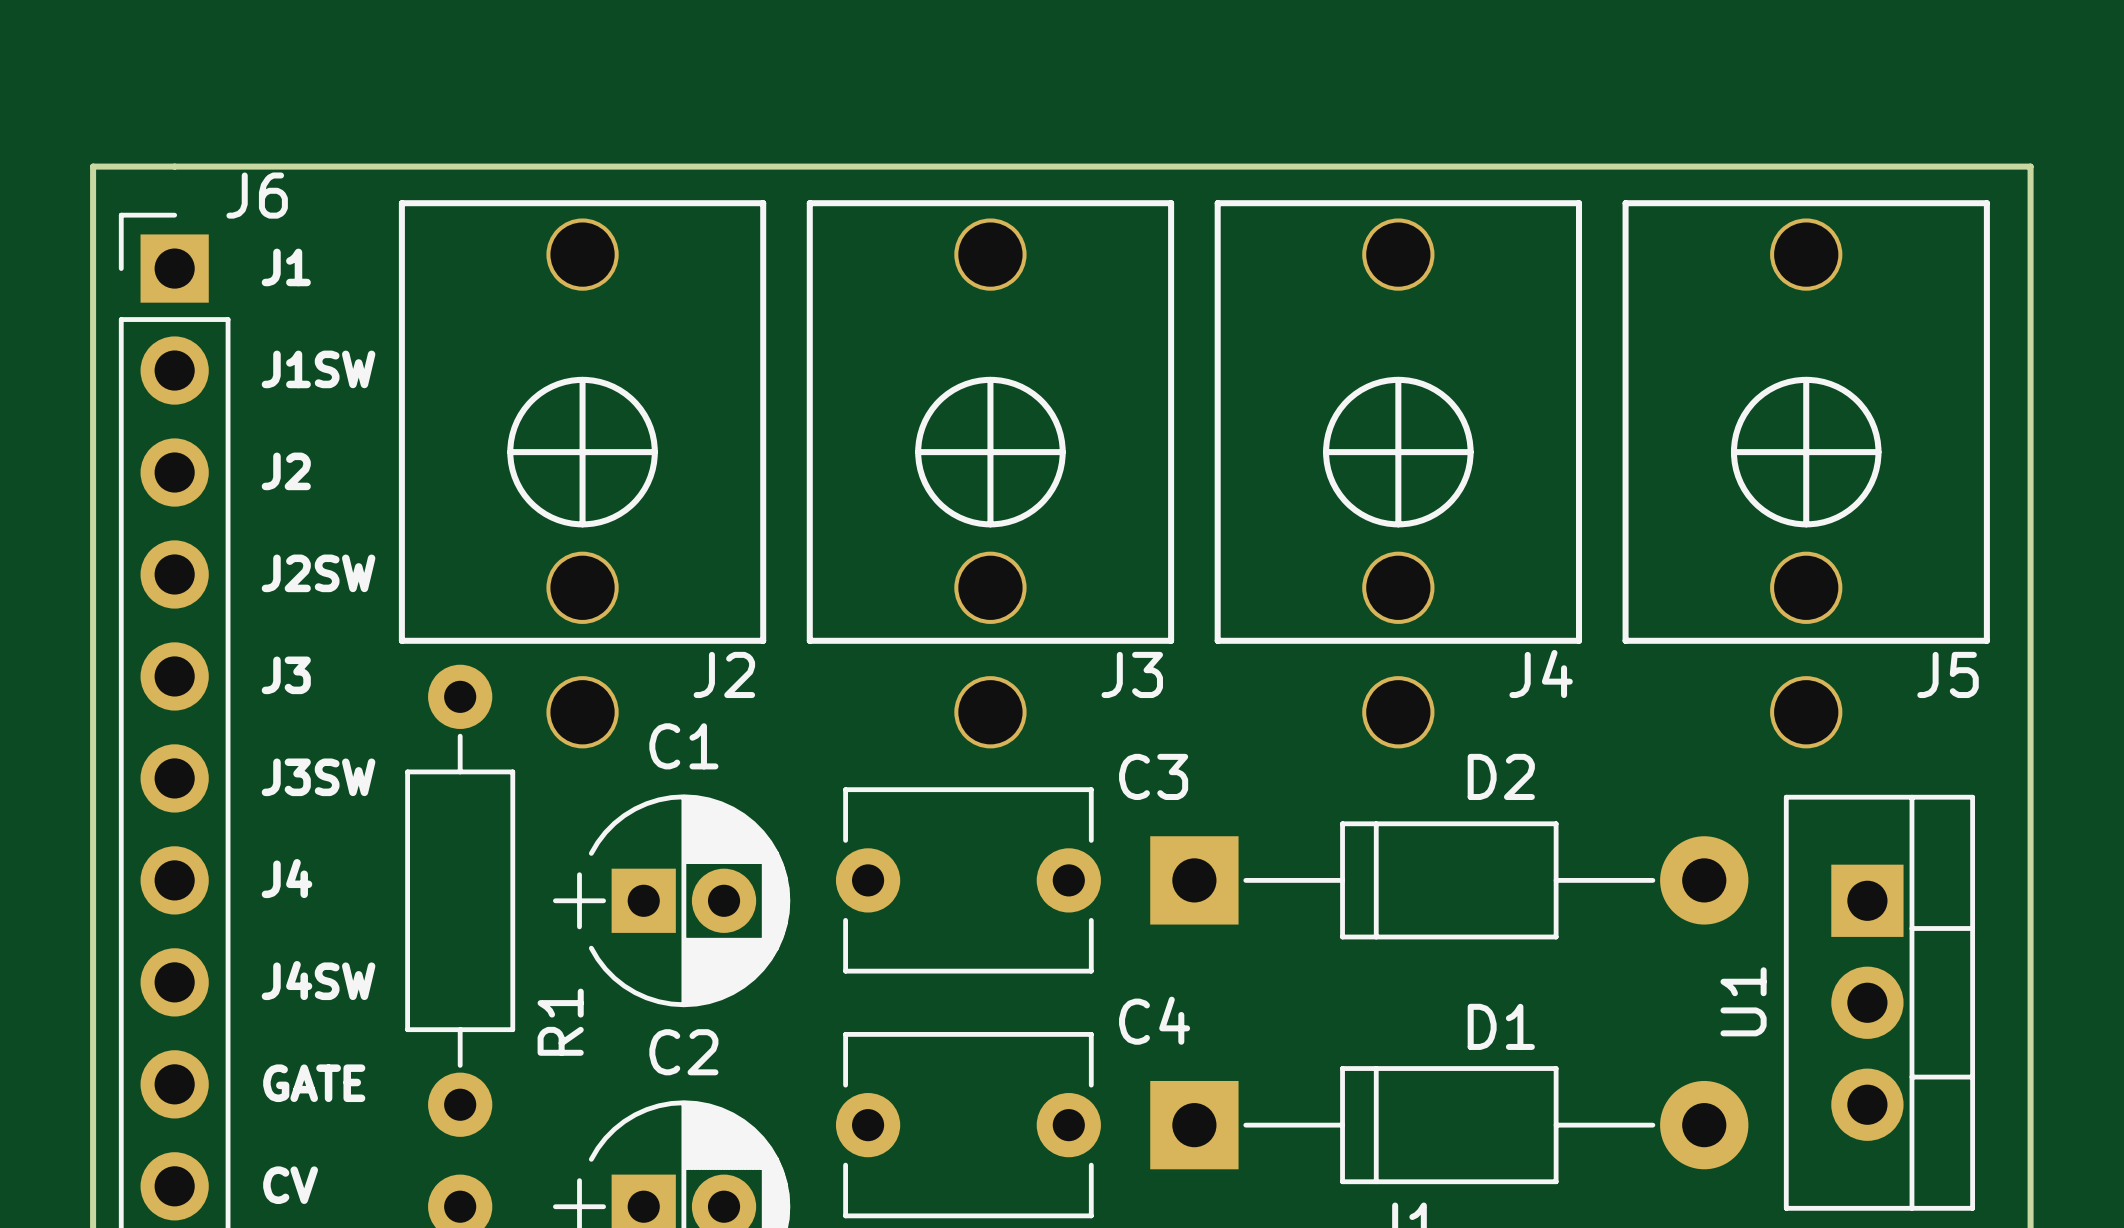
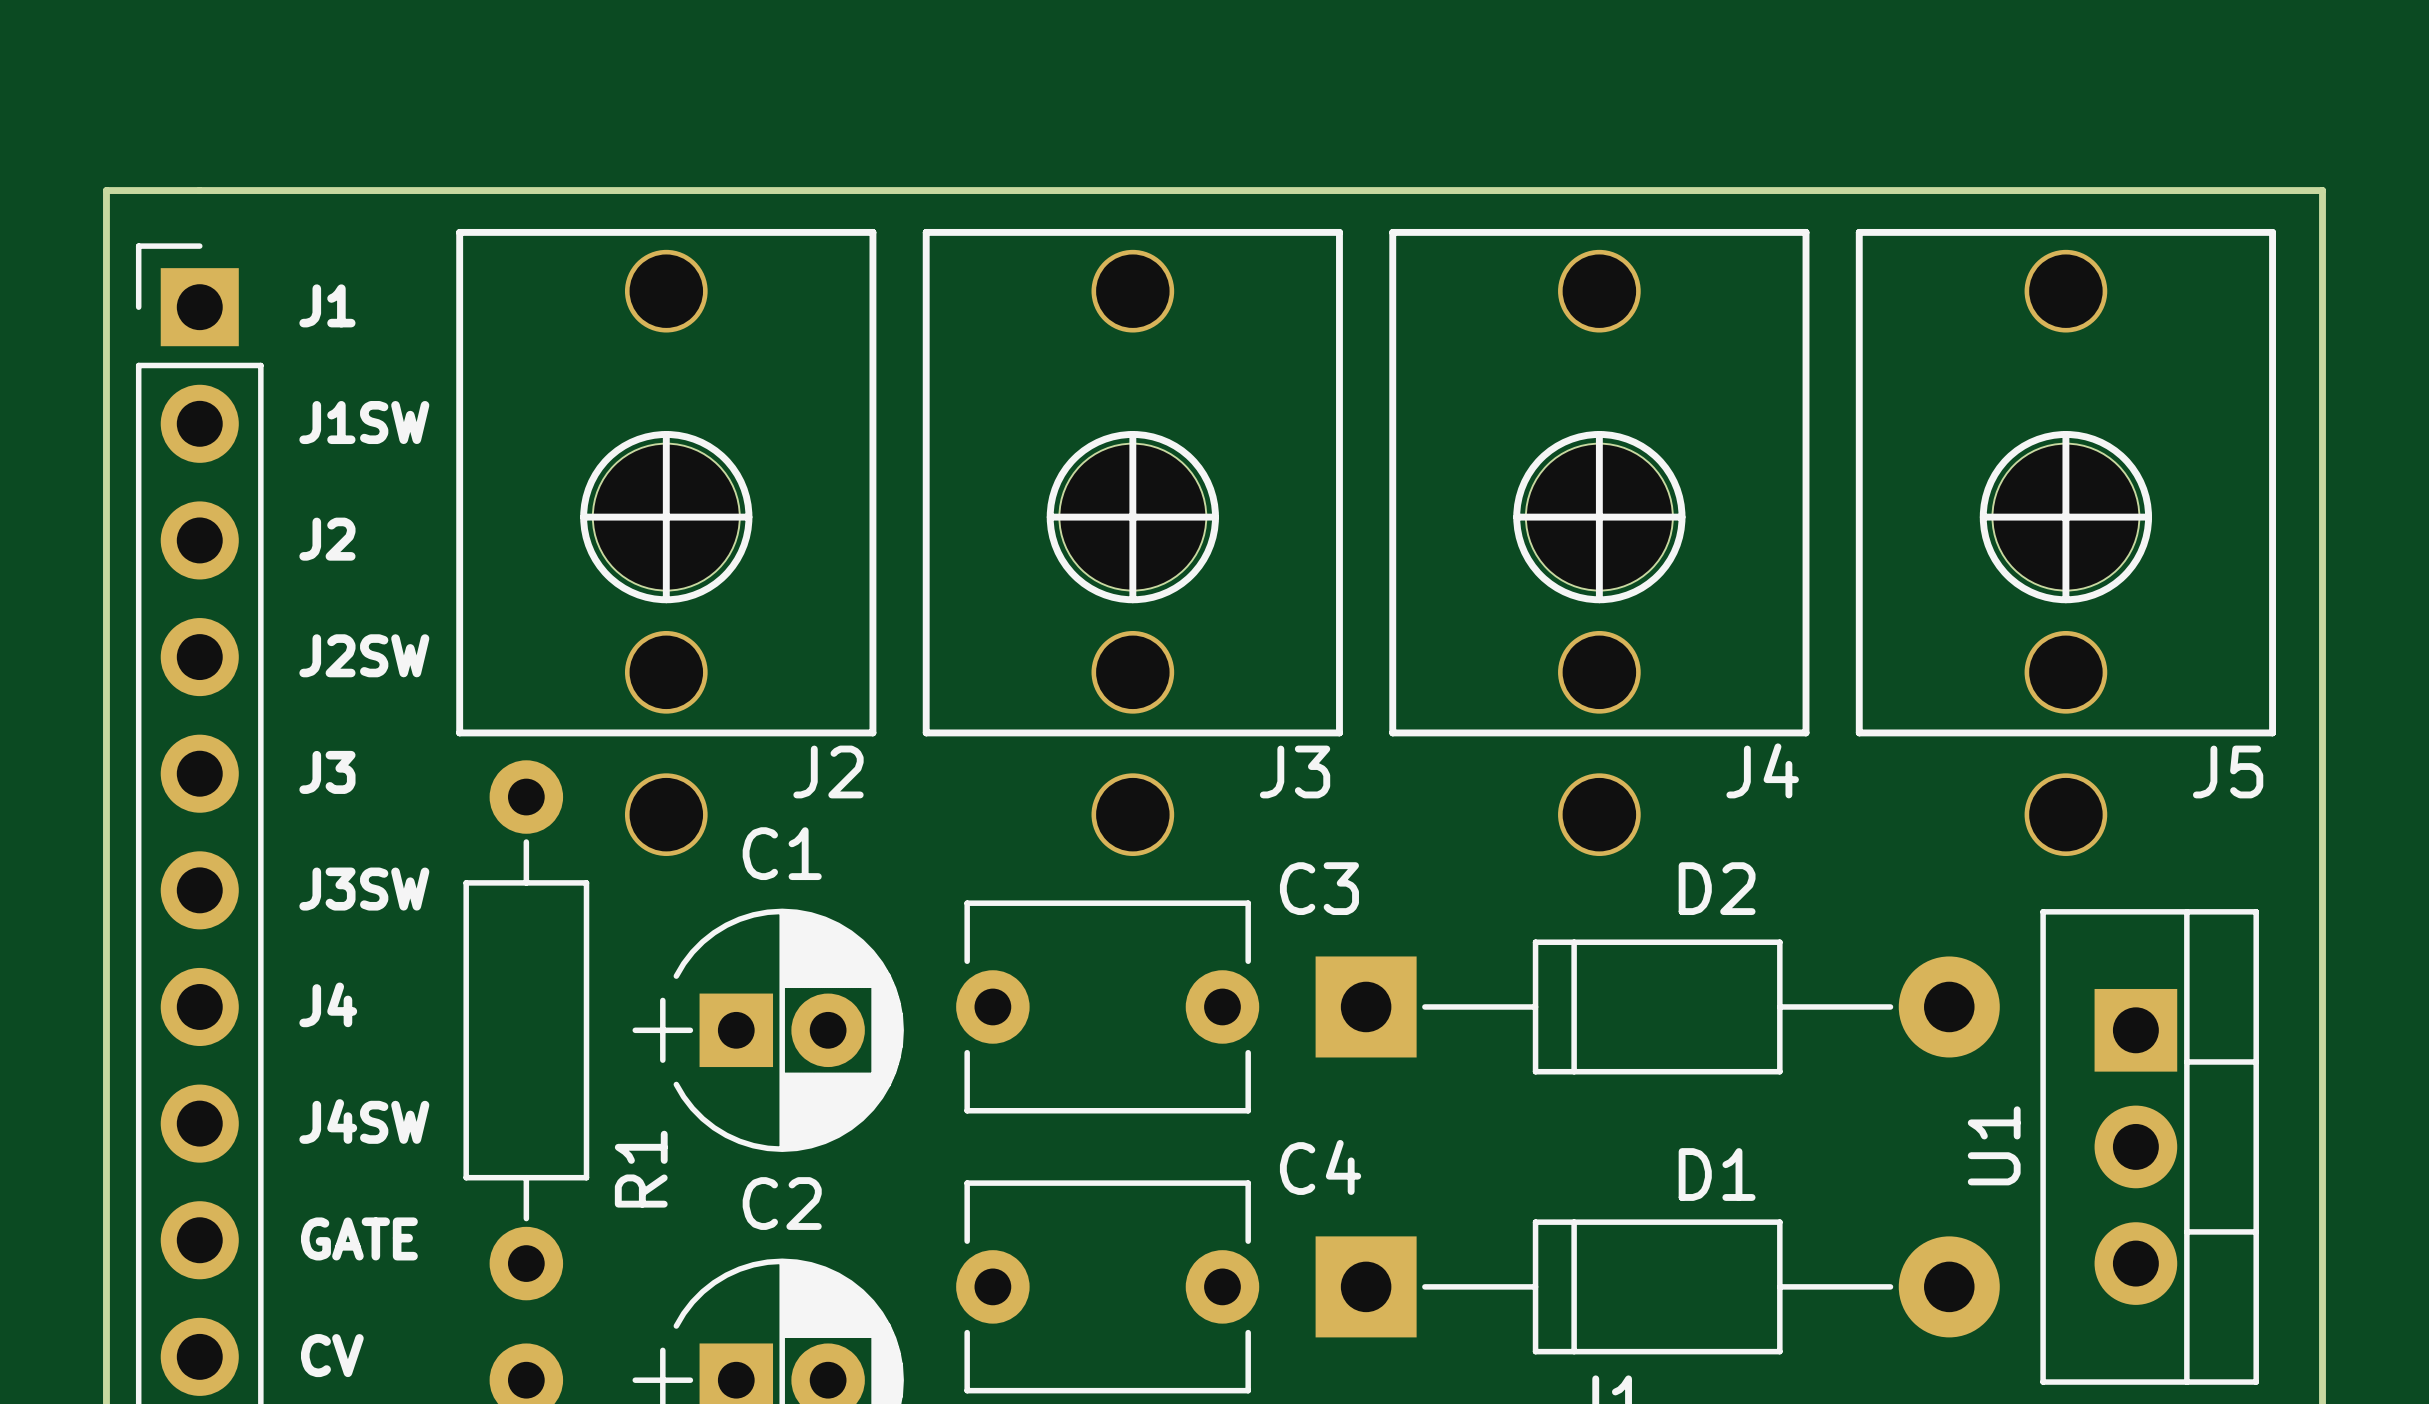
J6 name: J6 (257, 195) -> none
J2 footprint: [398, 200, 767, 749] -> [456, 228, 877, 856]
J3 footprint: [806, 200, 1175, 749] -> [922, 228, 1343, 856]
J4 footprint: [1214, 200, 1583, 749] -> [1389, 228, 1810, 856]
J5 footprint: [1622, 200, 1990, 749] -> [1855, 228, 2276, 856]

